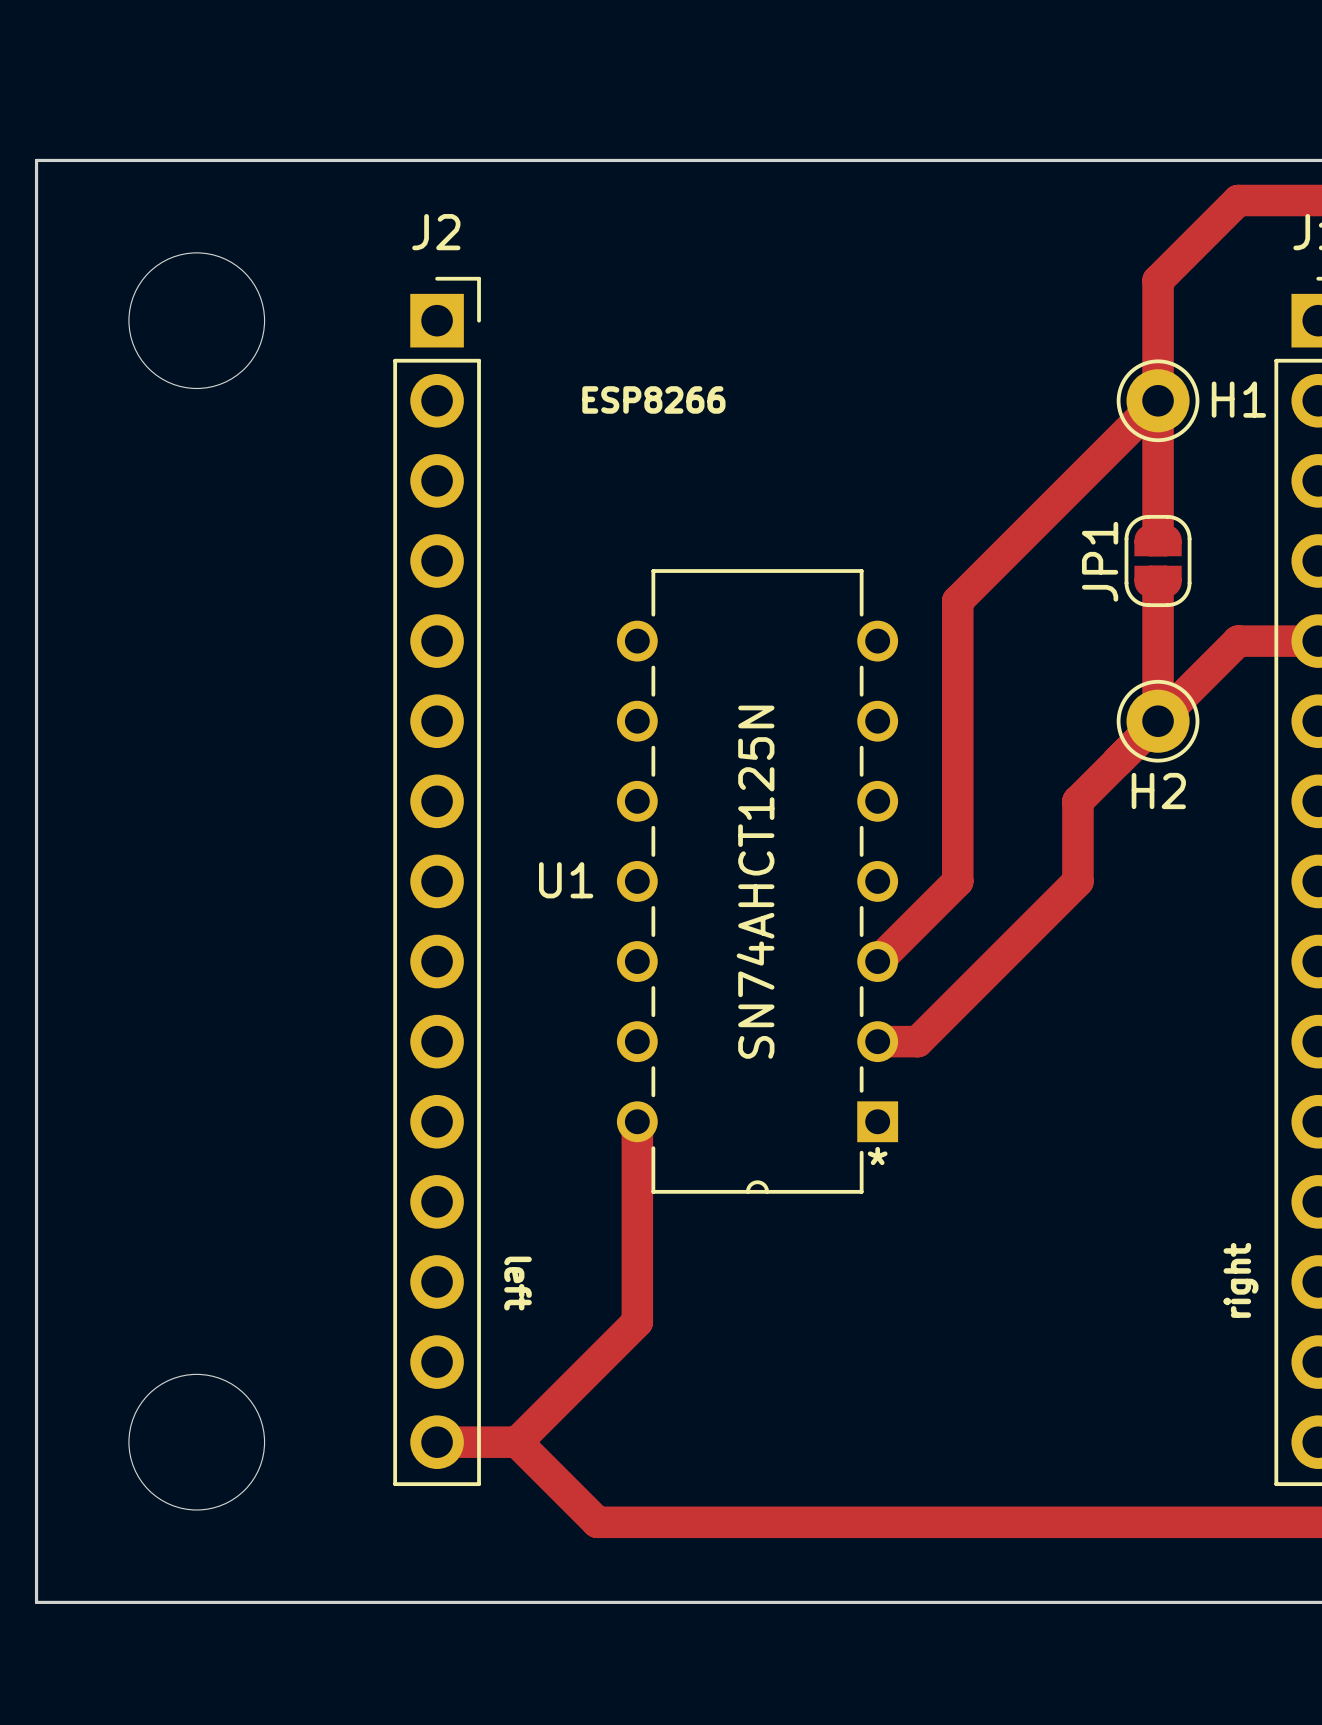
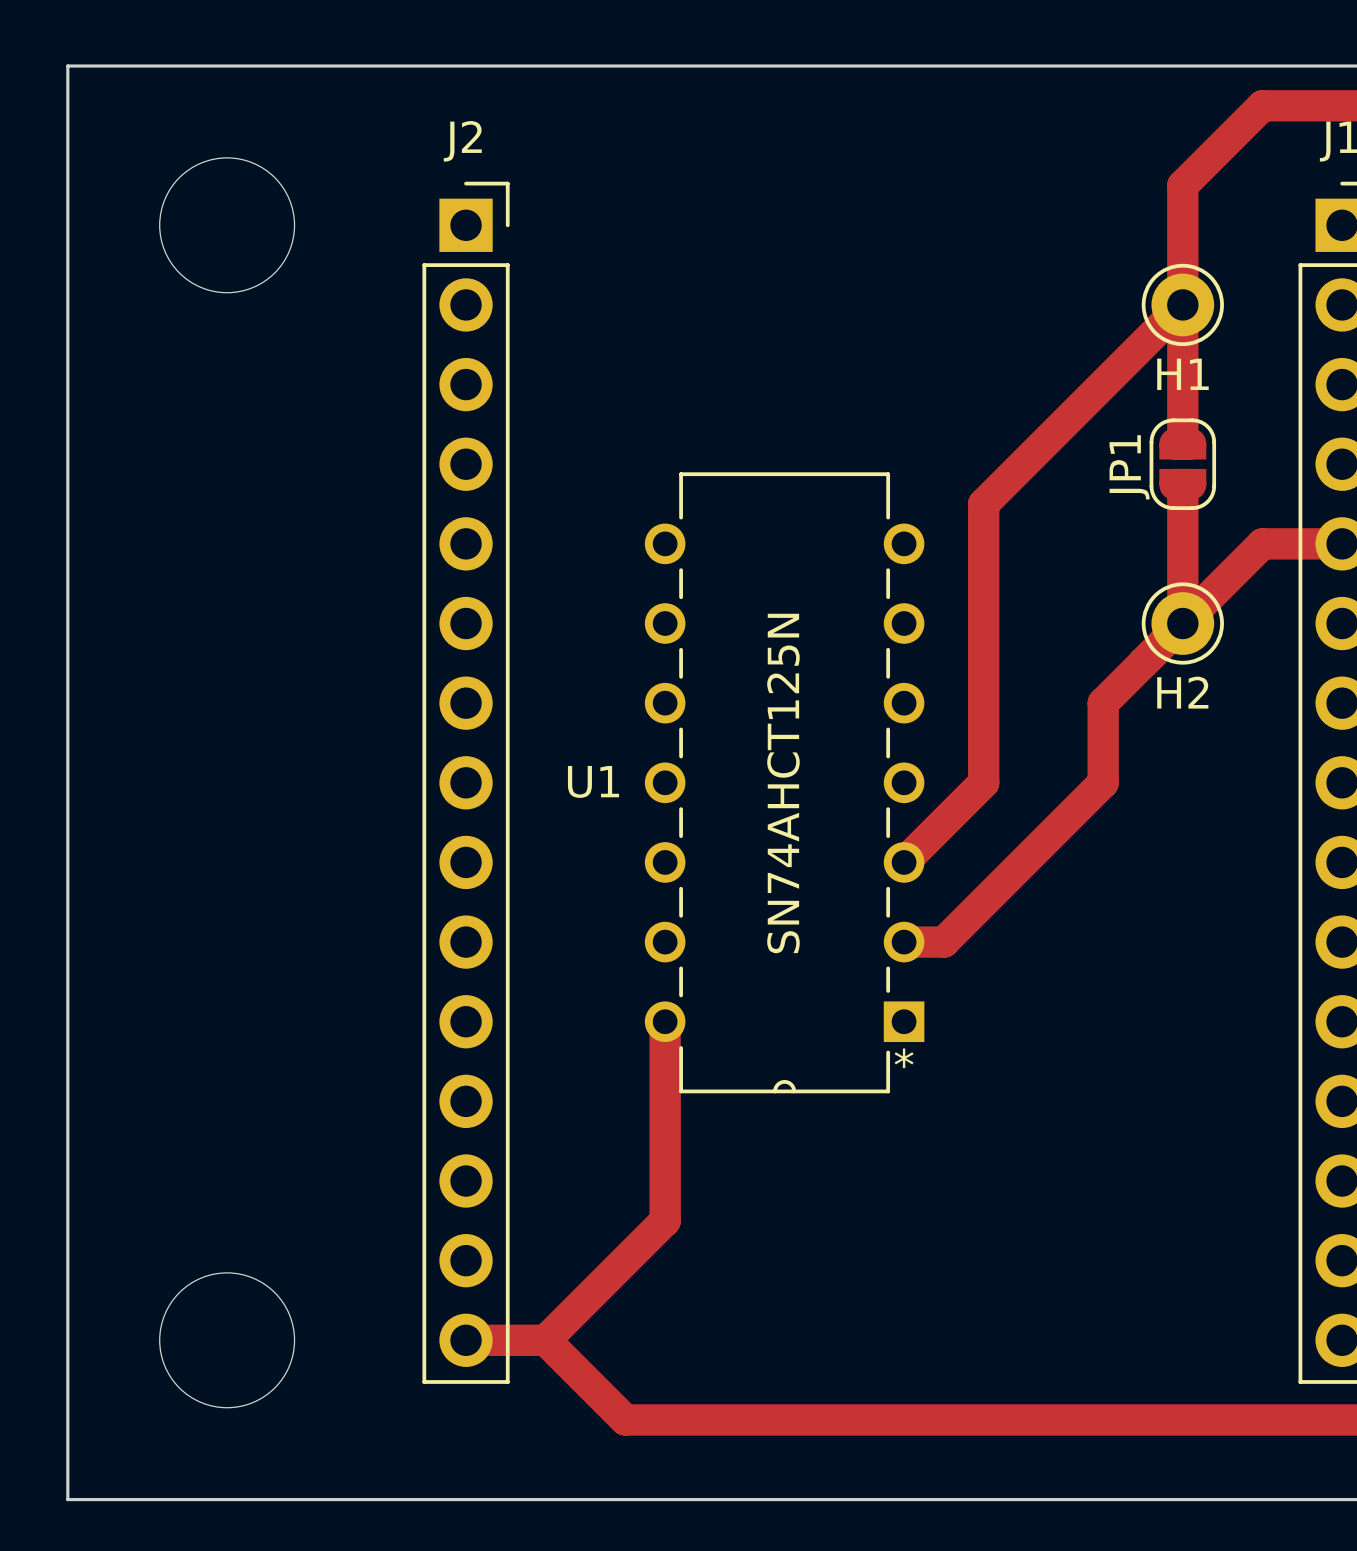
text: ESP8266 (653, 399) -> none
H1 name position: H1 (1238, 399) -> H1 (1182, 374)
text: right (1241, 1280) -> none
text: left (518, 1283) -> none

